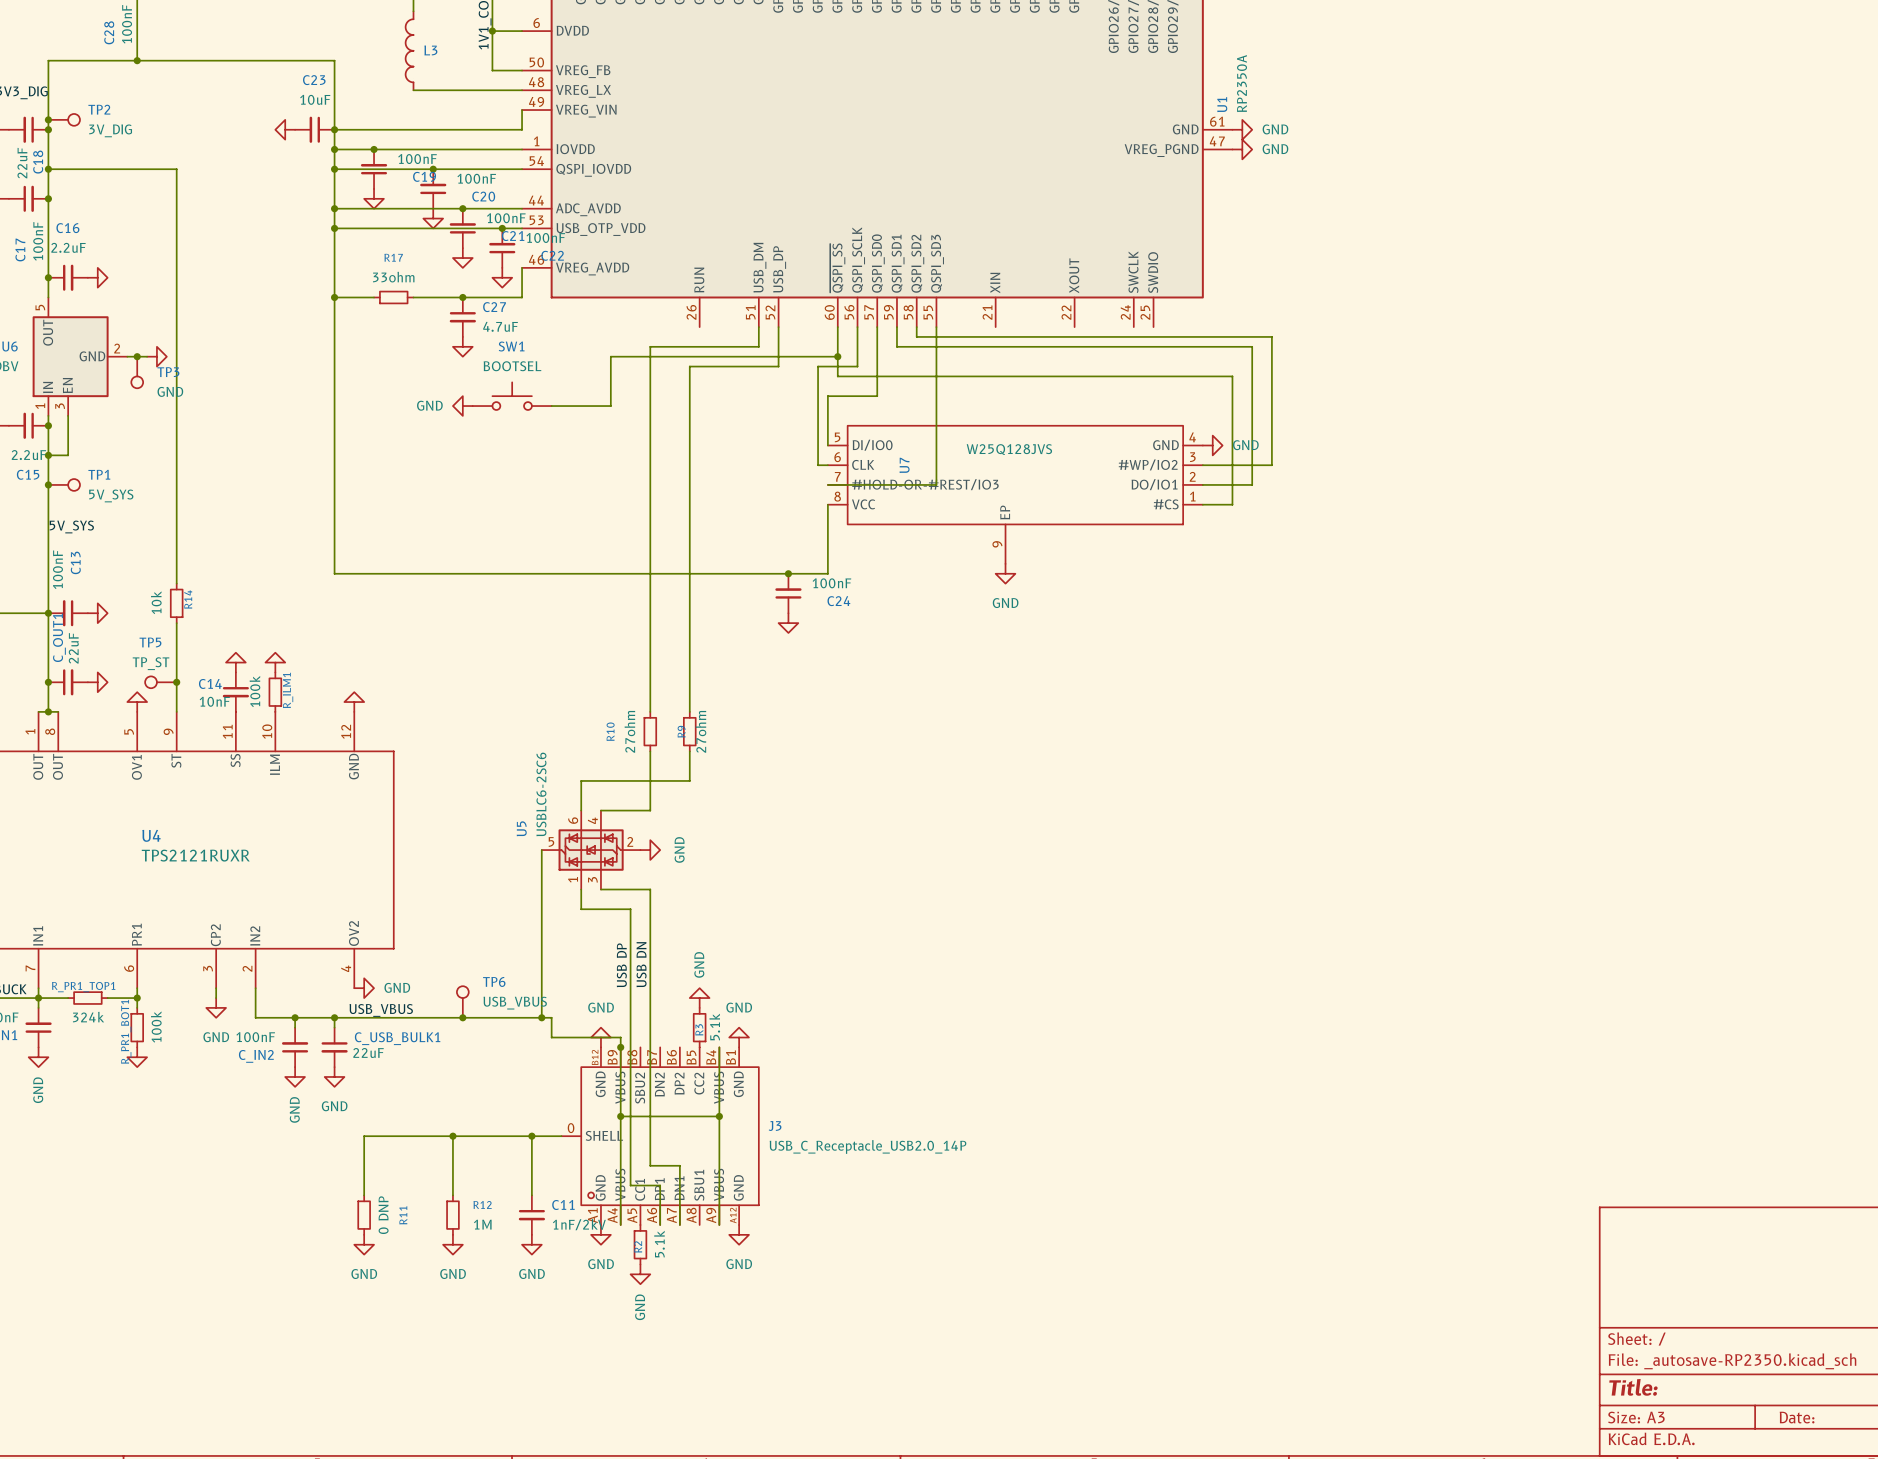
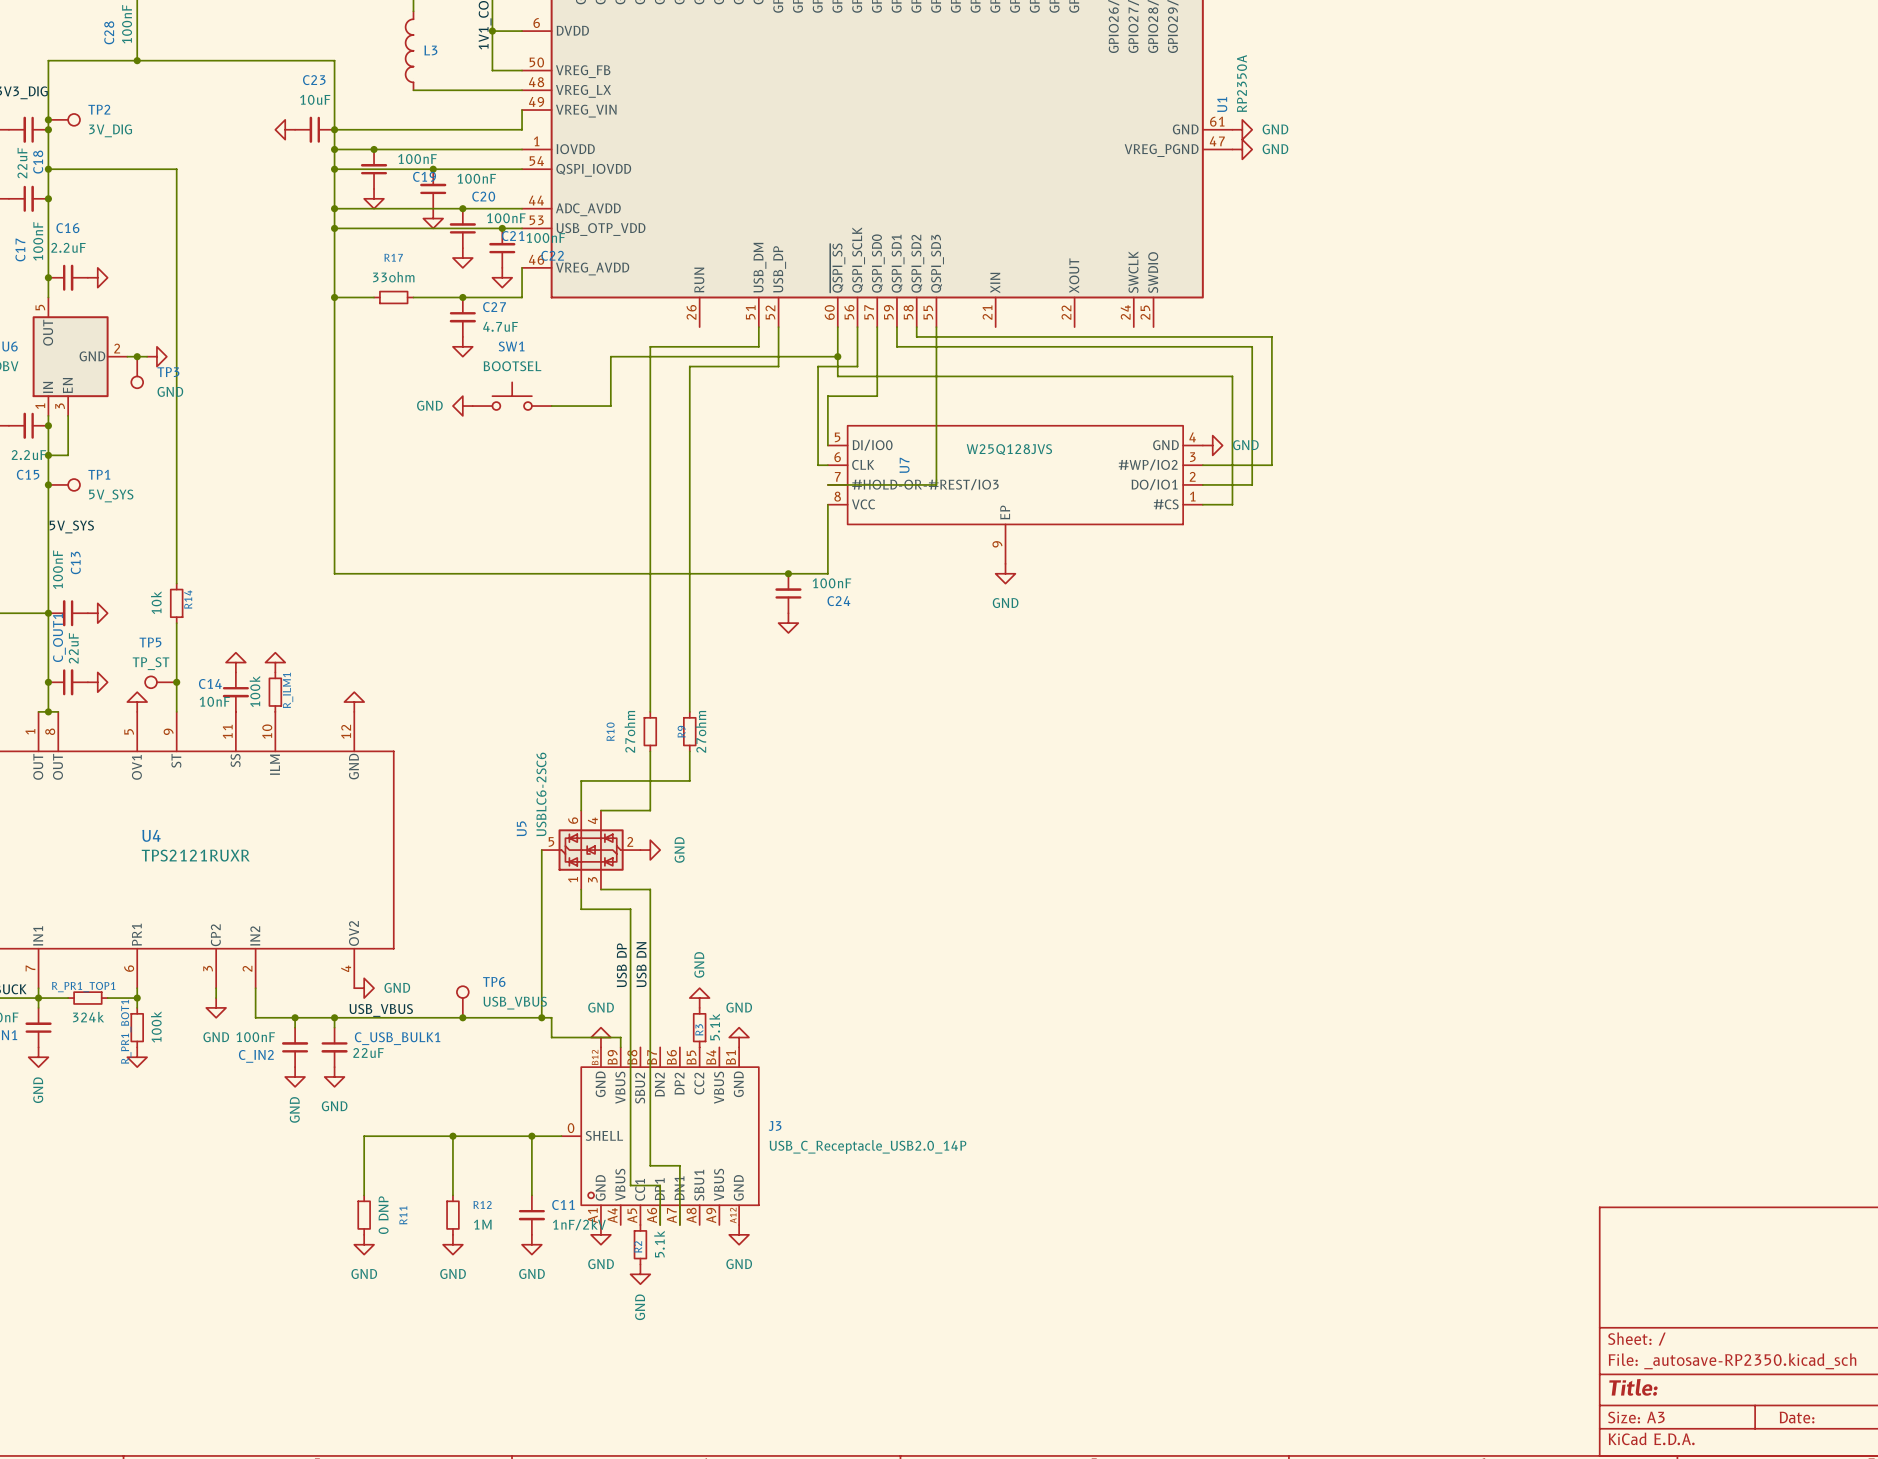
wire: (620, 1047) (620, 1224) -> none
junction: (620, 1047) -> none
wire: (719, 1047) (719, 1224) -> none
wire: (620, 1116) (719, 1116) -> none
junction: (620, 1116) -> none
junction: (719, 1116) -> none

